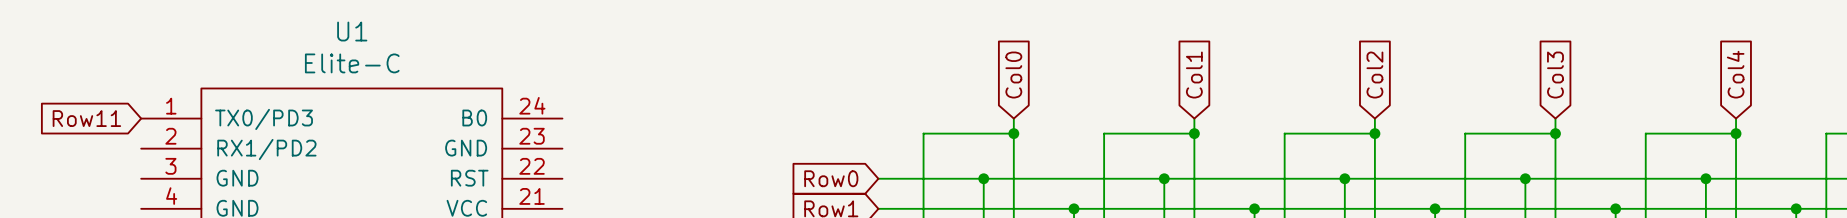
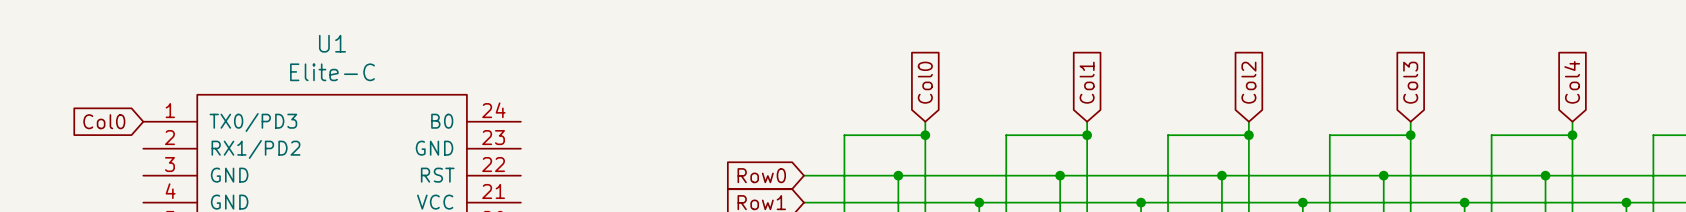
global label: Row11 (86, 118) -> Col0 (104, 121)

